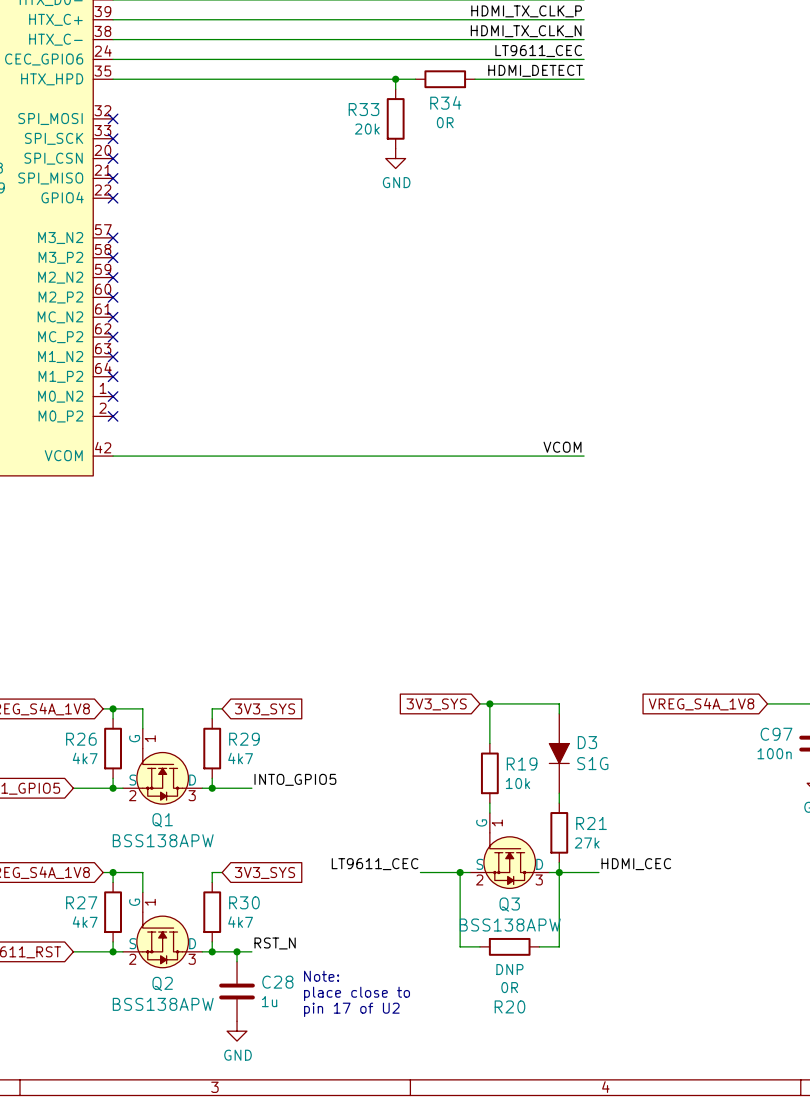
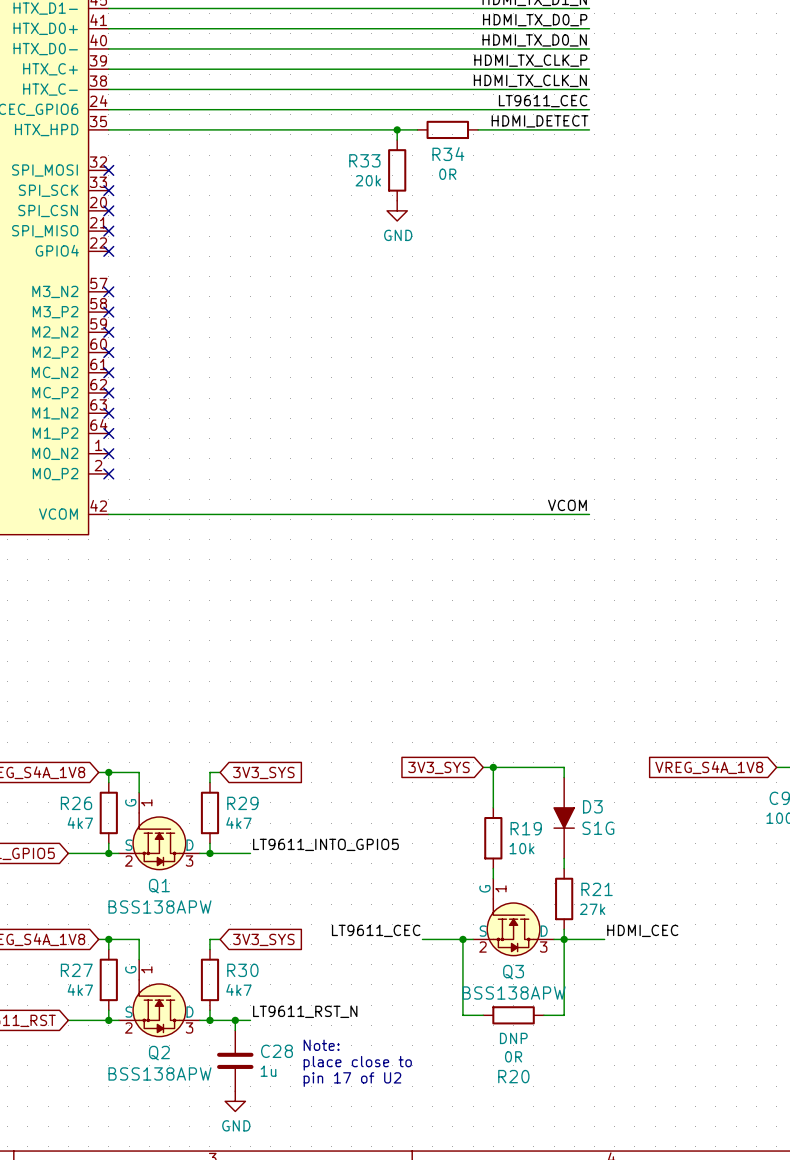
label: INTO_GPIO5 (295, 779) -> LT9611_INTO_GPIO5 (325, 844)
label: RST_N (275, 943) -> LT9611_RST_N (305, 1011)

